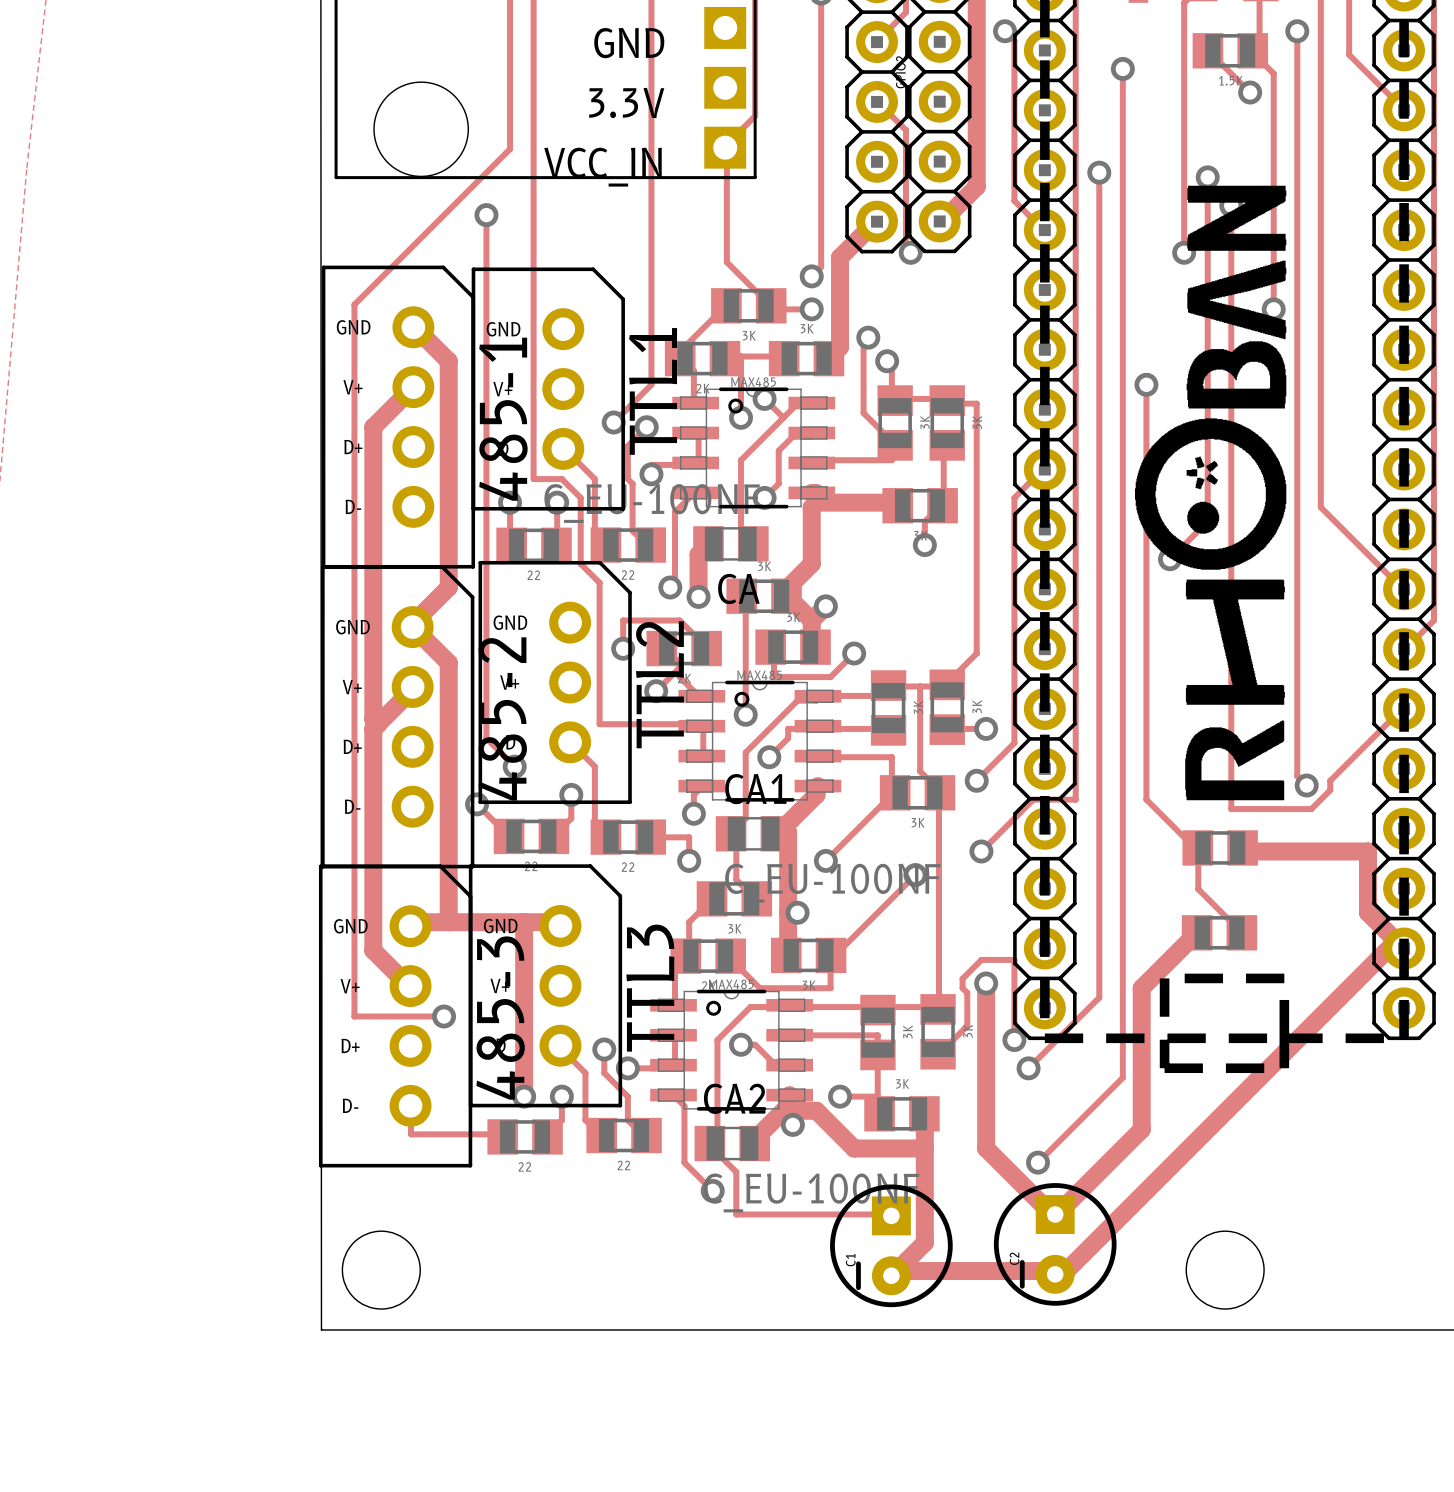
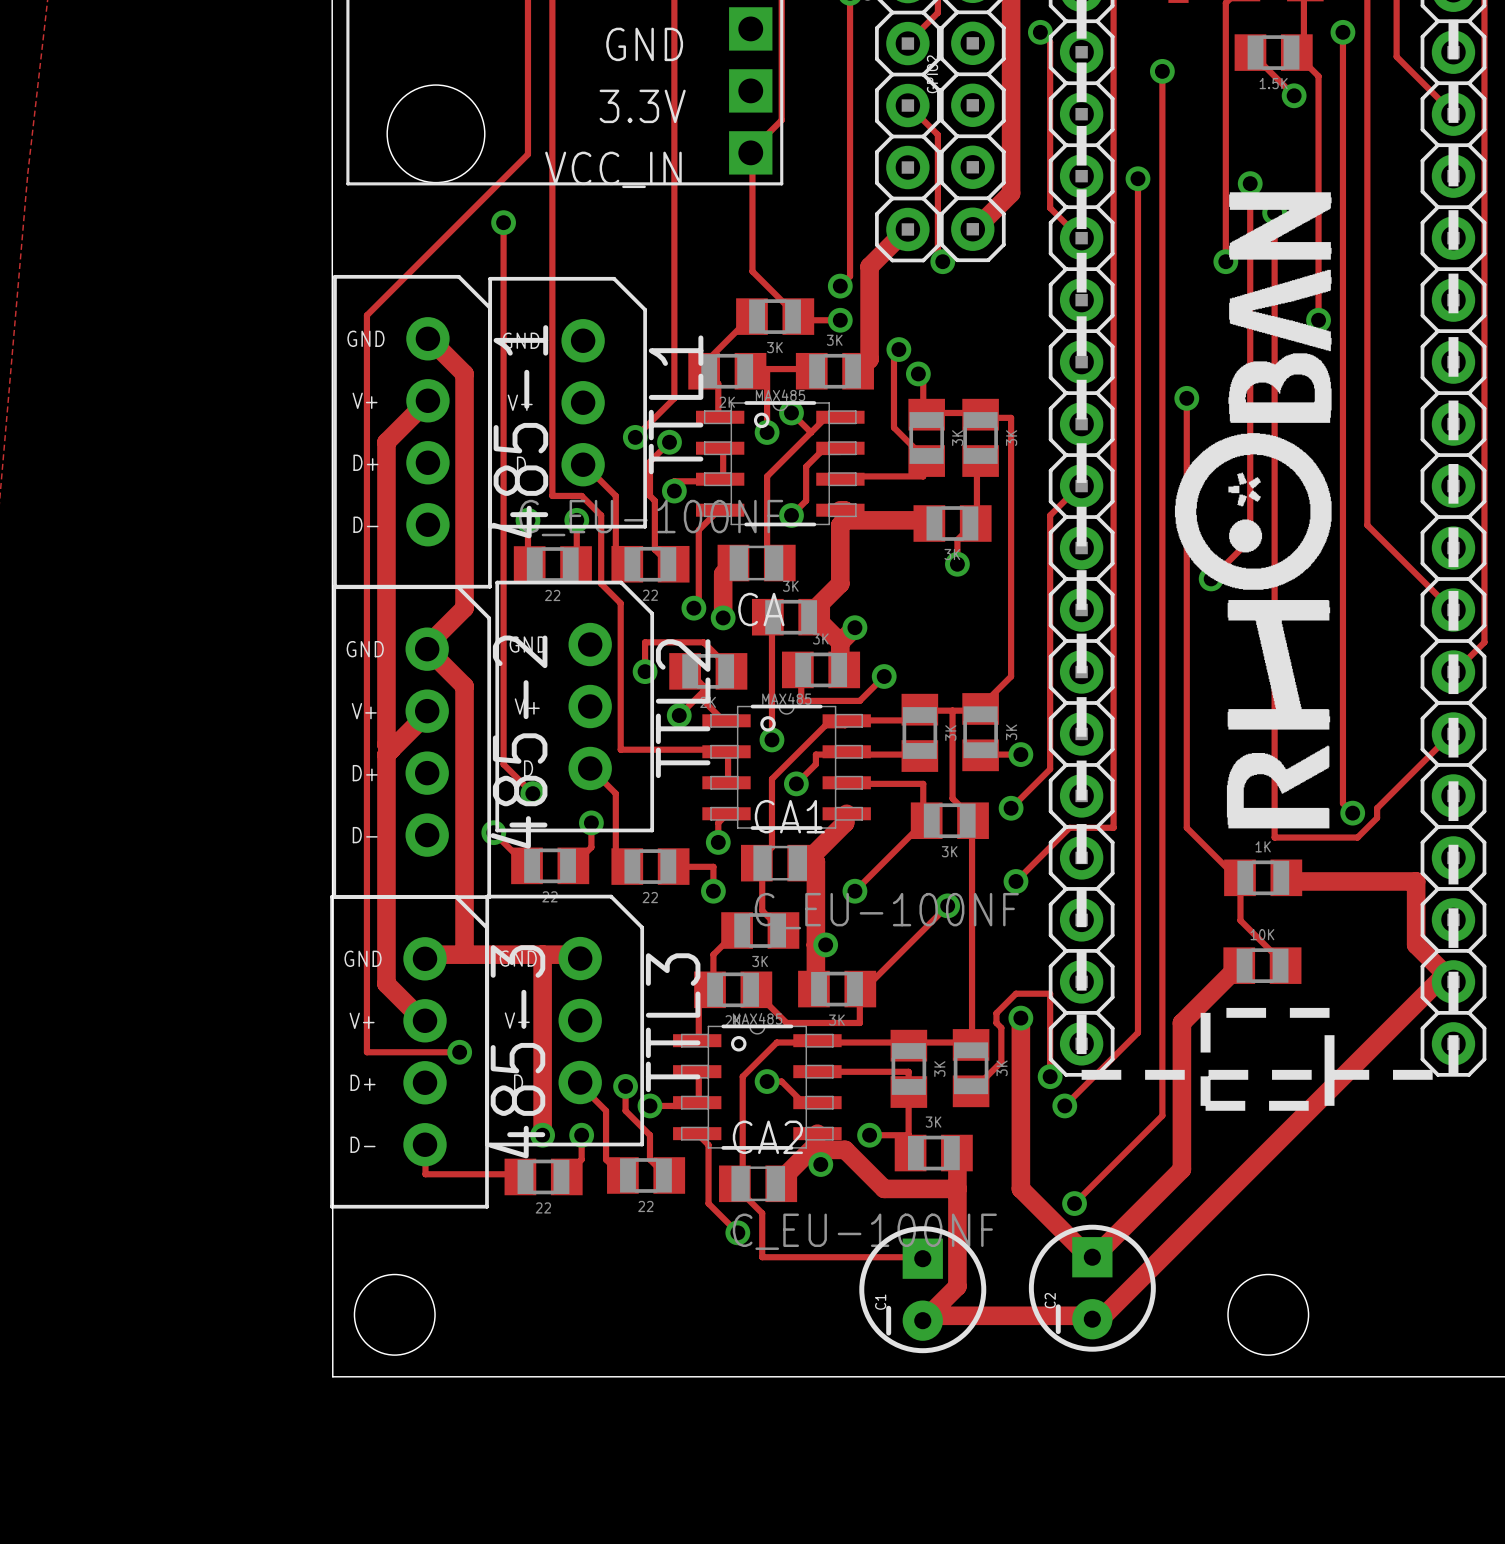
part value: none -> 1K (1263, 846)
part value: none -> 10K (1262, 934)

